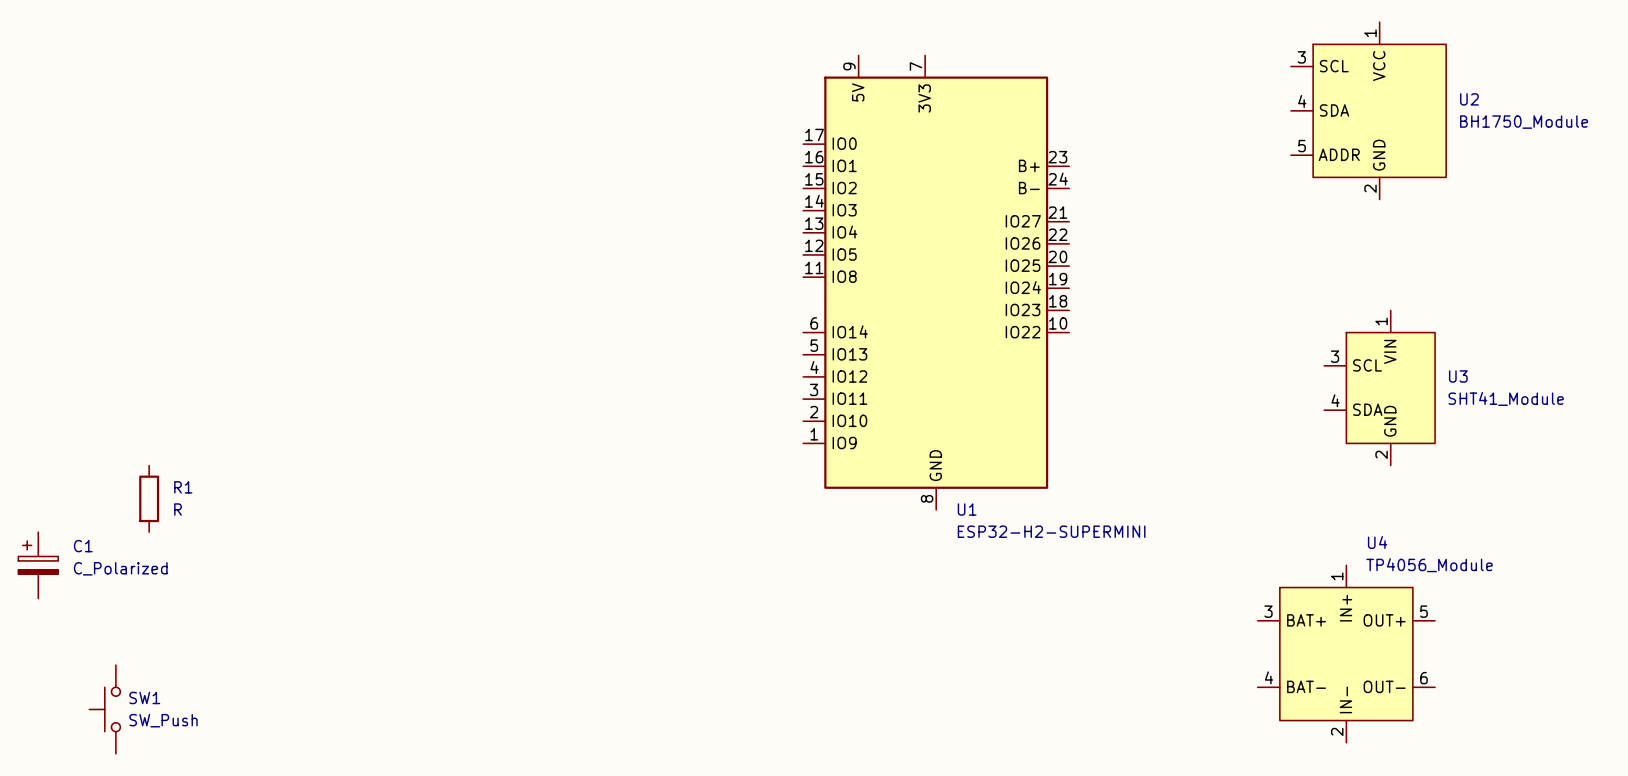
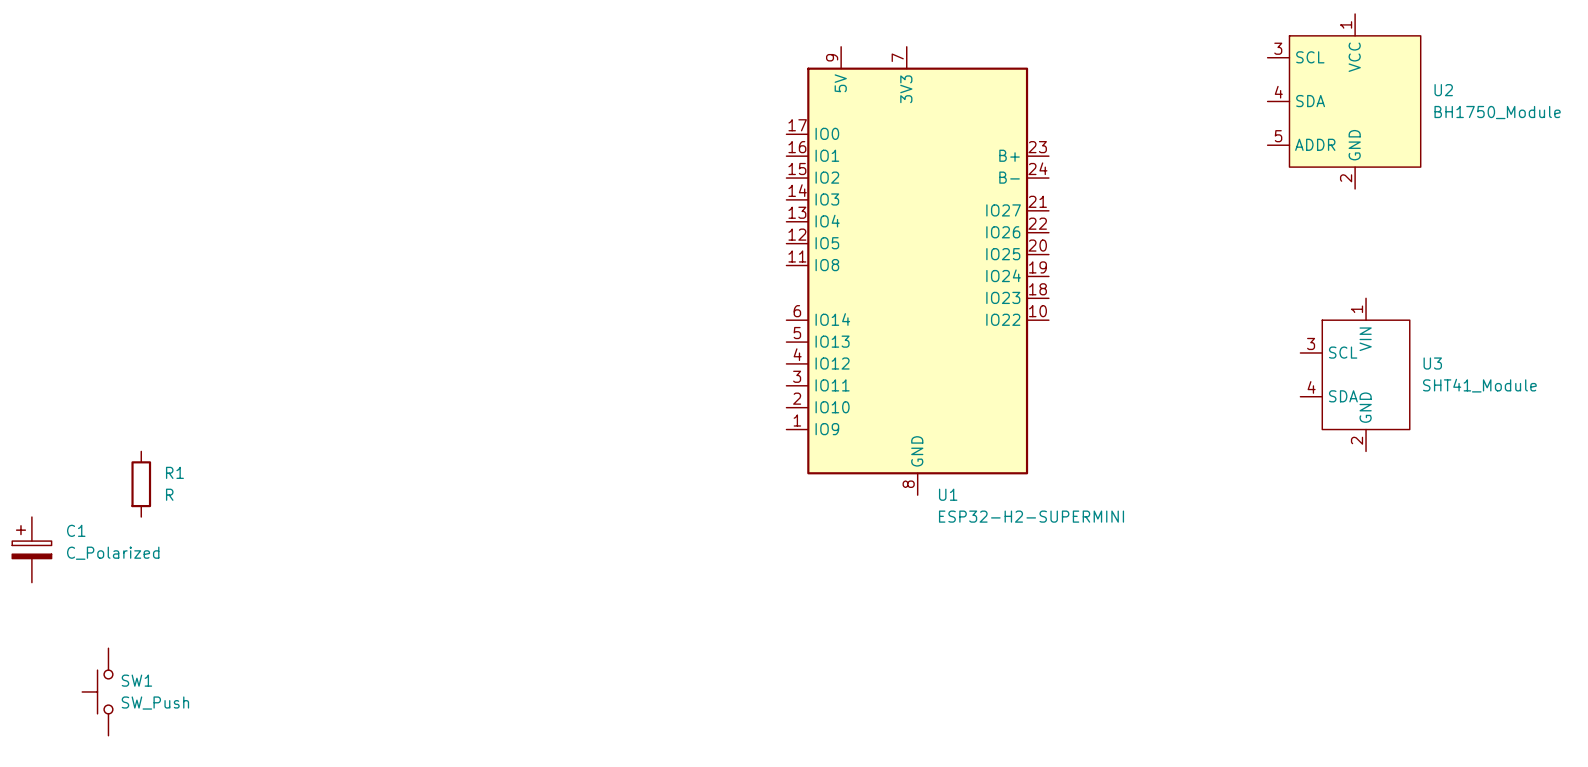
U3 symbol: [1324, 310, 1436, 466] -> [1300, 298, 1410, 452]
U4: TP4056_Module (1346, 654) -> none

